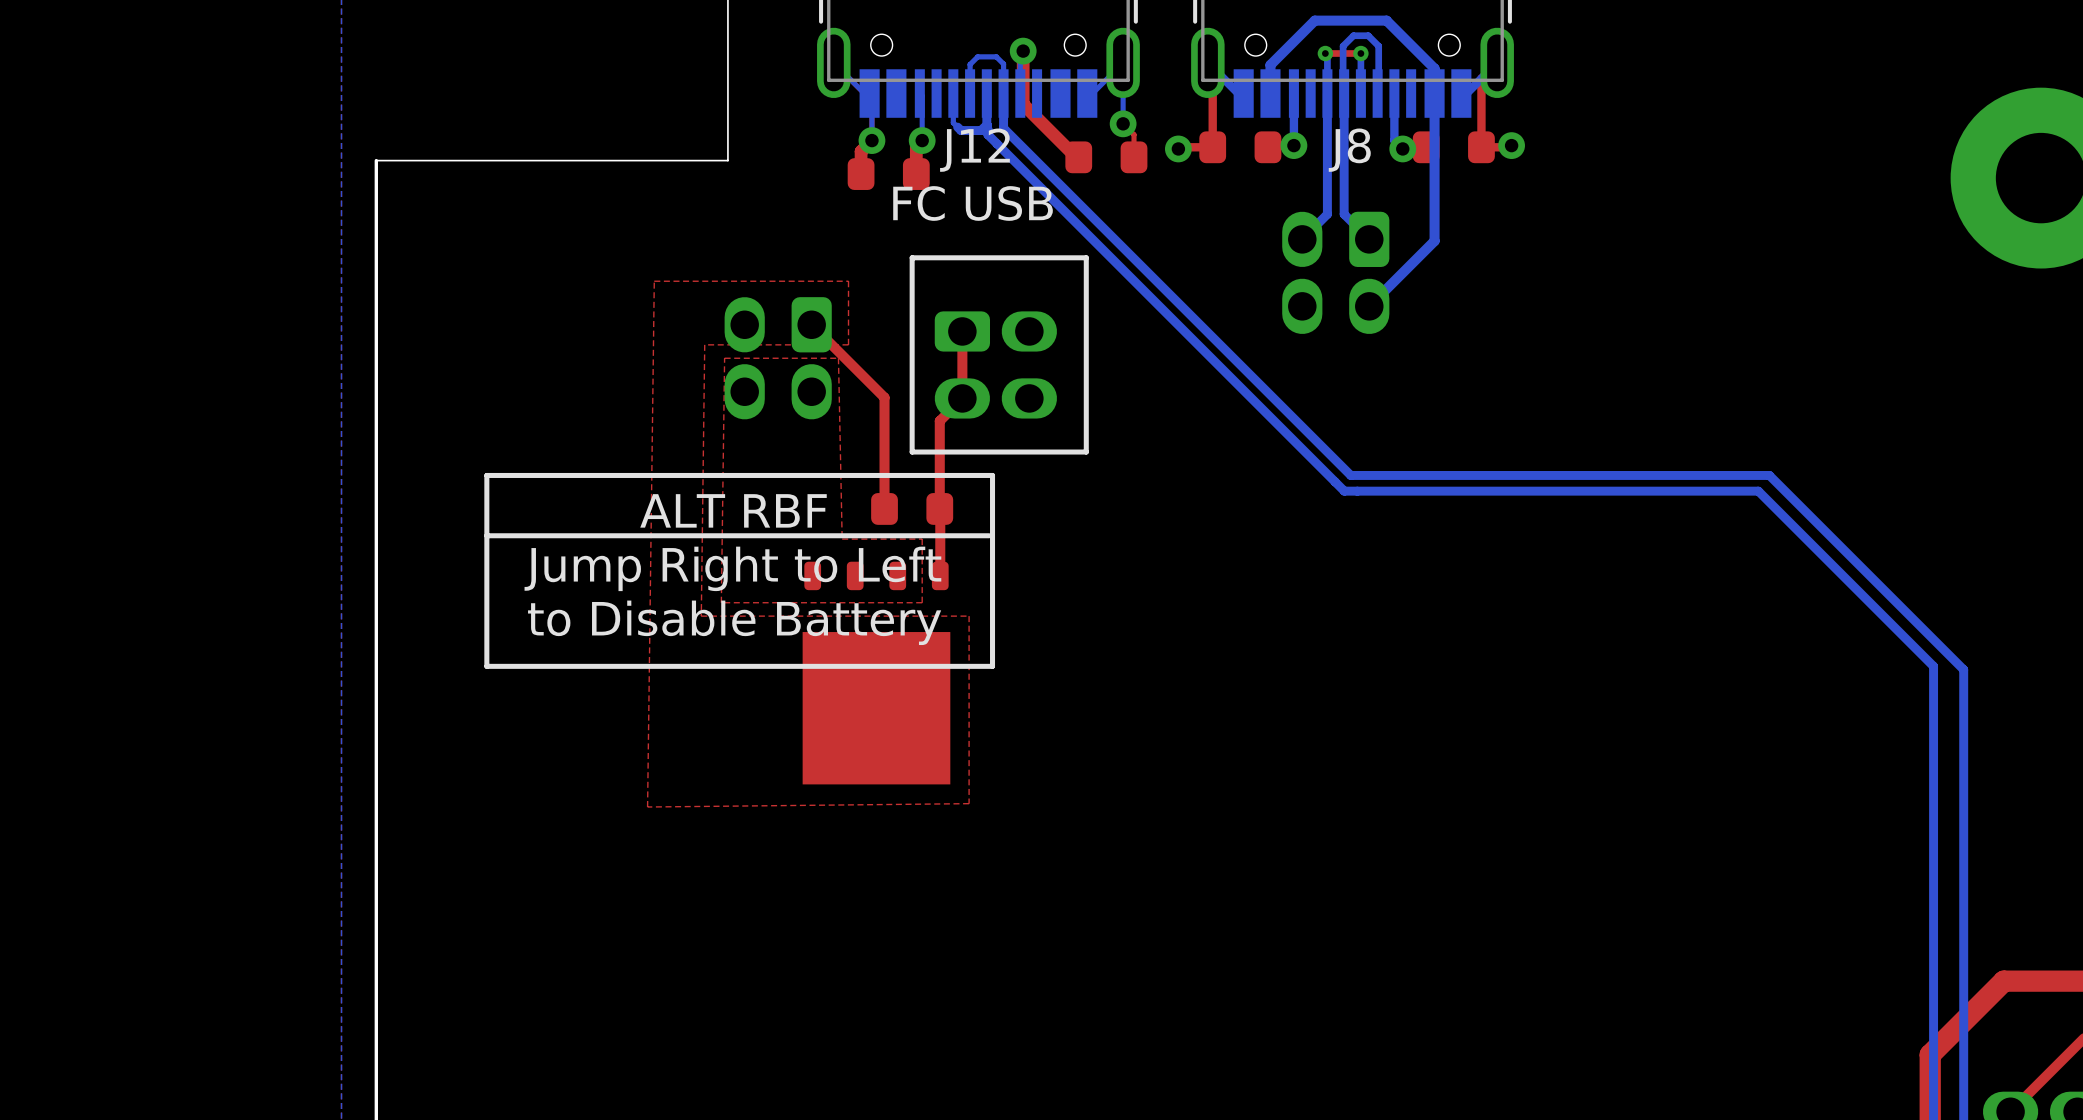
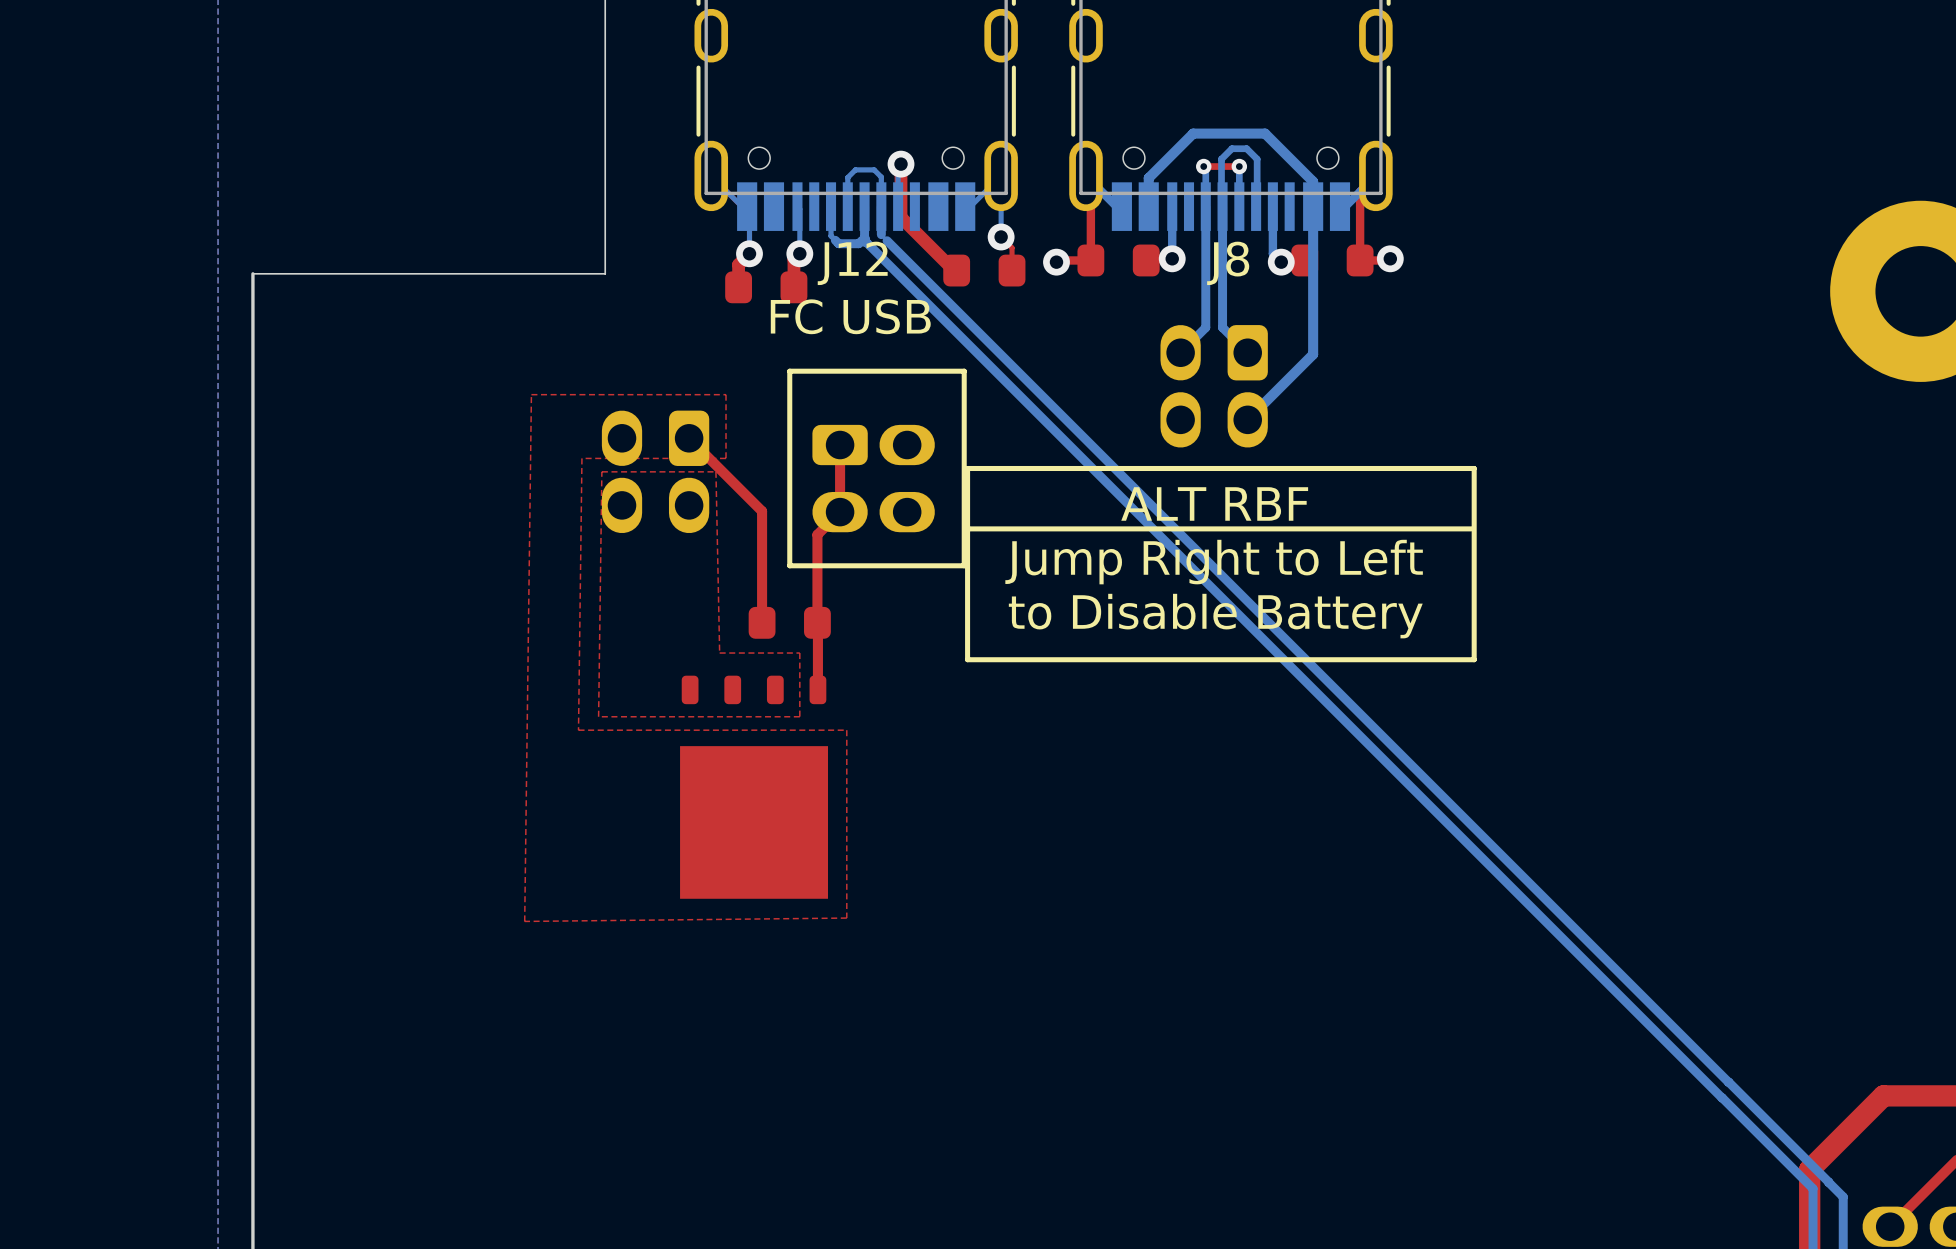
bottom track: (1003, 121) (1003, 128) (1350, 475) (1769, 475) (1963, 669) (1963, 1082) -> (1828, 1182) (1843, 1196)
bottom track: none -> (887, 240) (1728, 1082)
bottom track: (987, 129) (987, 134) (1344, 491) (1758, 491) (1933, 666) (1933, 1073) -> (866, 242) (1722, 1097)
line: (992, 475) (486, 475) (486, 666) (992, 666) (992, 475) -> (1474, 468) (967, 468) (967, 659) (1474, 659) (1474, 468)
text position: ALT RBF (733, 510) -> ALT RBF (1214, 503)
line: (989, 535) (486, 535) -> (1470, 528) (967, 528)
text position: Jump Right to Left (732, 568) -> Jump Right to Left (1214, 562)
text position: to Disable Battery (734, 622) -> to Disable Battery (1215, 616)
bottom track: none -> (1728, 1082) (1828, 1182)
bottom track: none -> (1722, 1097) (1813, 1188)

